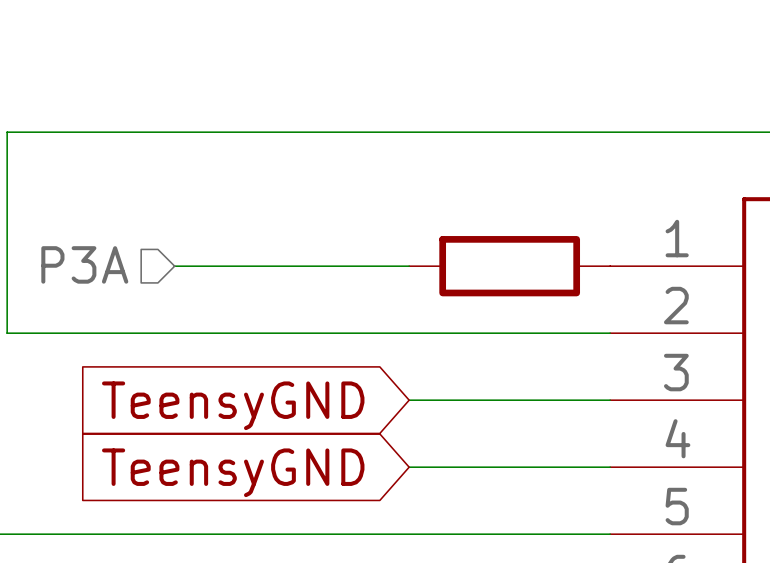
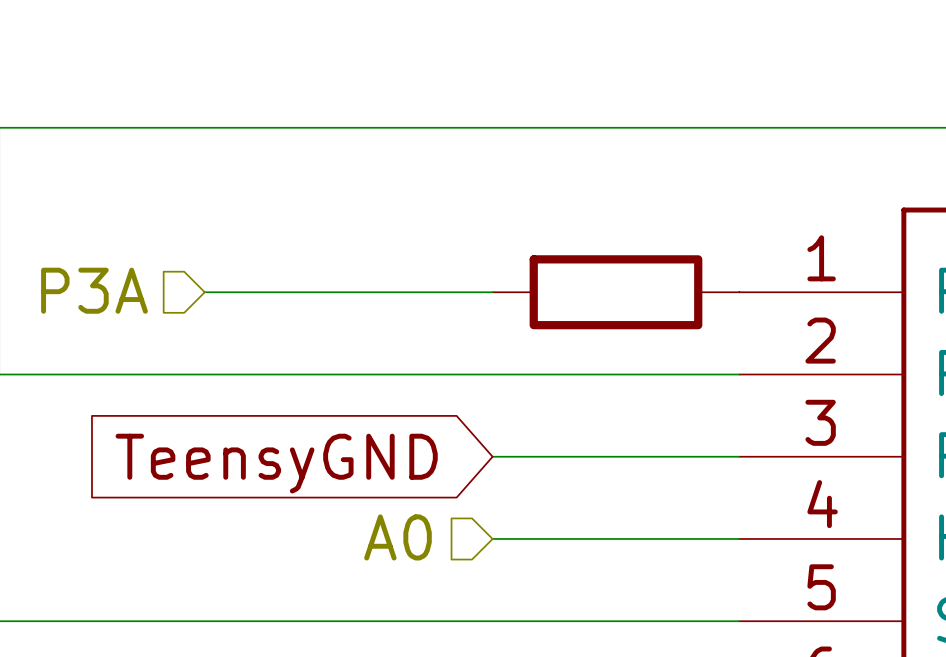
hierarchical label: none -> A0 (397, 537)
global label: TeensyGND (233, 472) -> none

